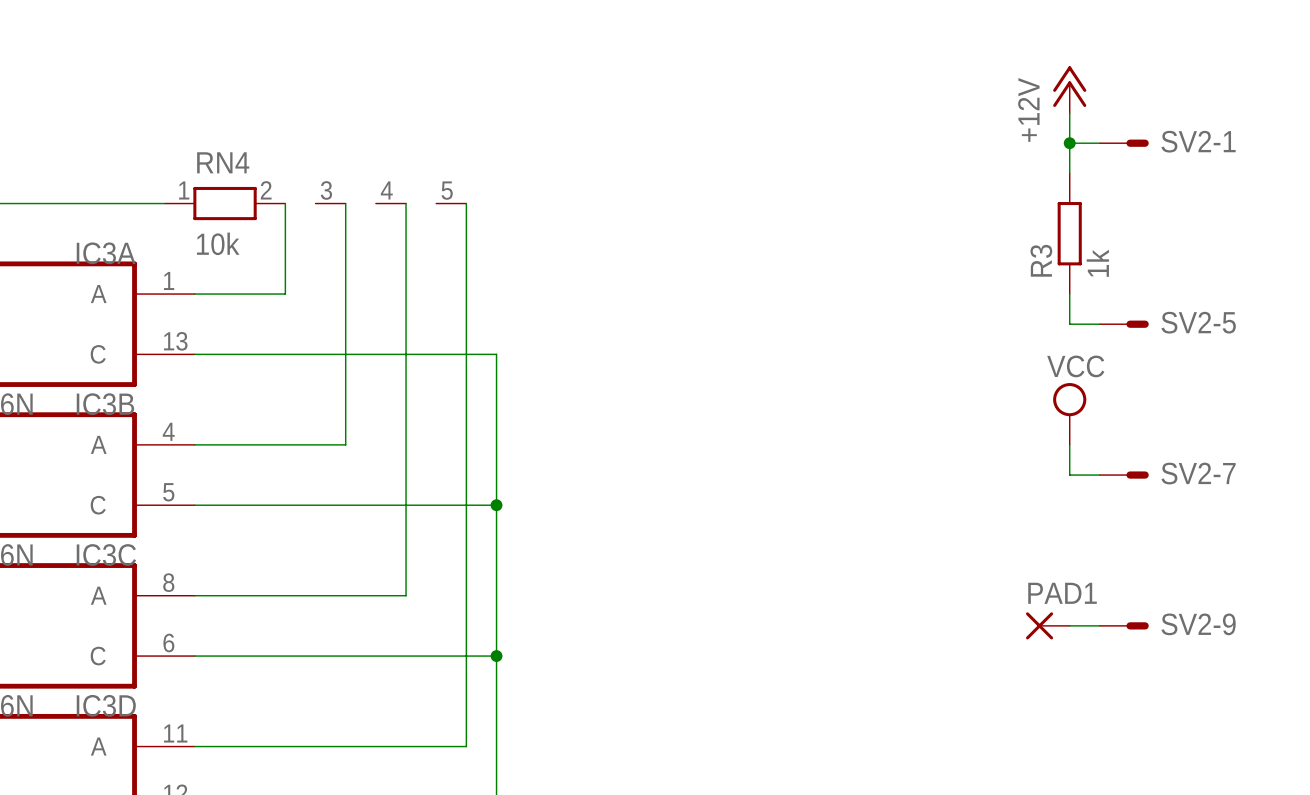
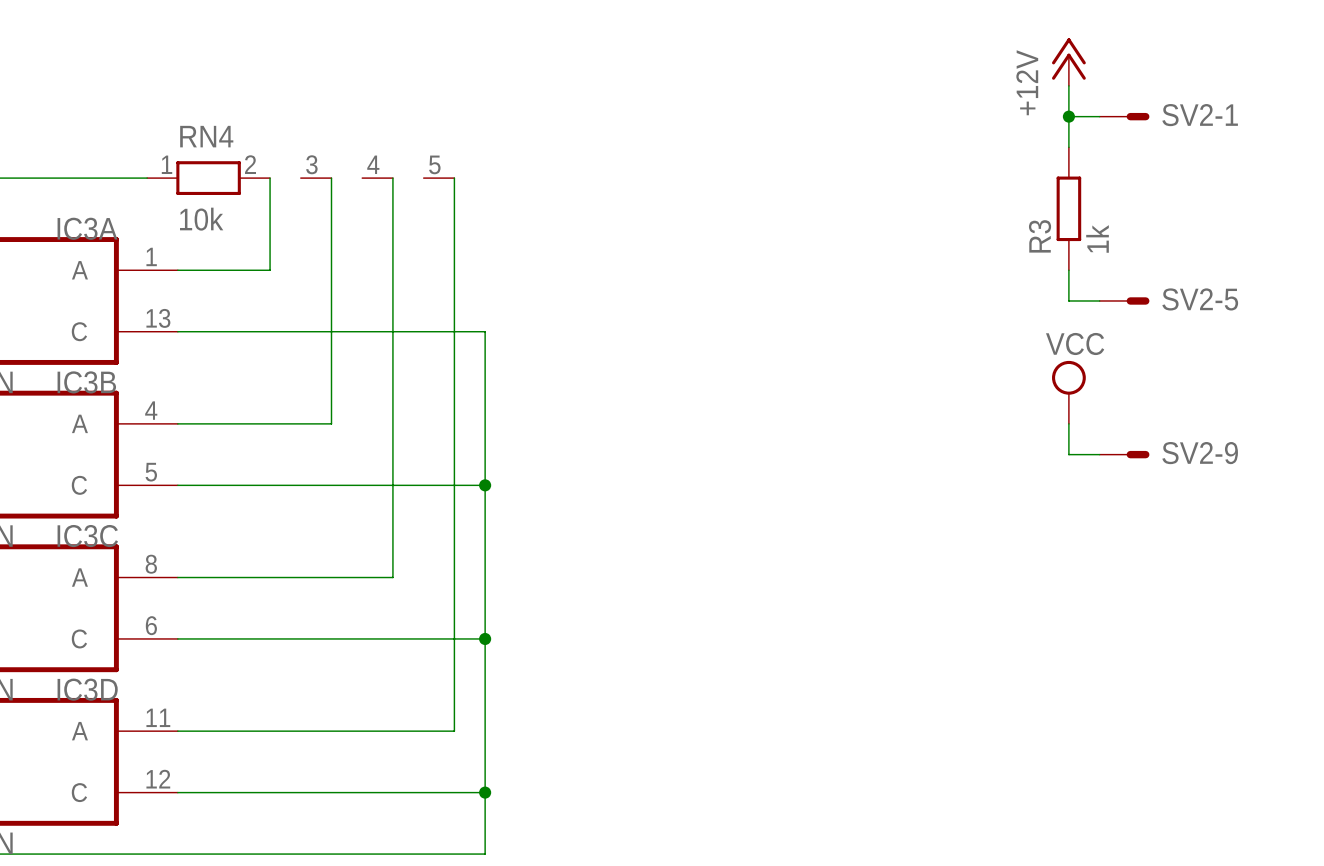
SV2-7 name: SV2-7 (1198, 473) -> SV2-9 (1200, 453)
PAD1: (1047, 625) -> none
wire: (1069, 625) (1099, 625) -> none
SV2-9: (1124, 625) -> none

